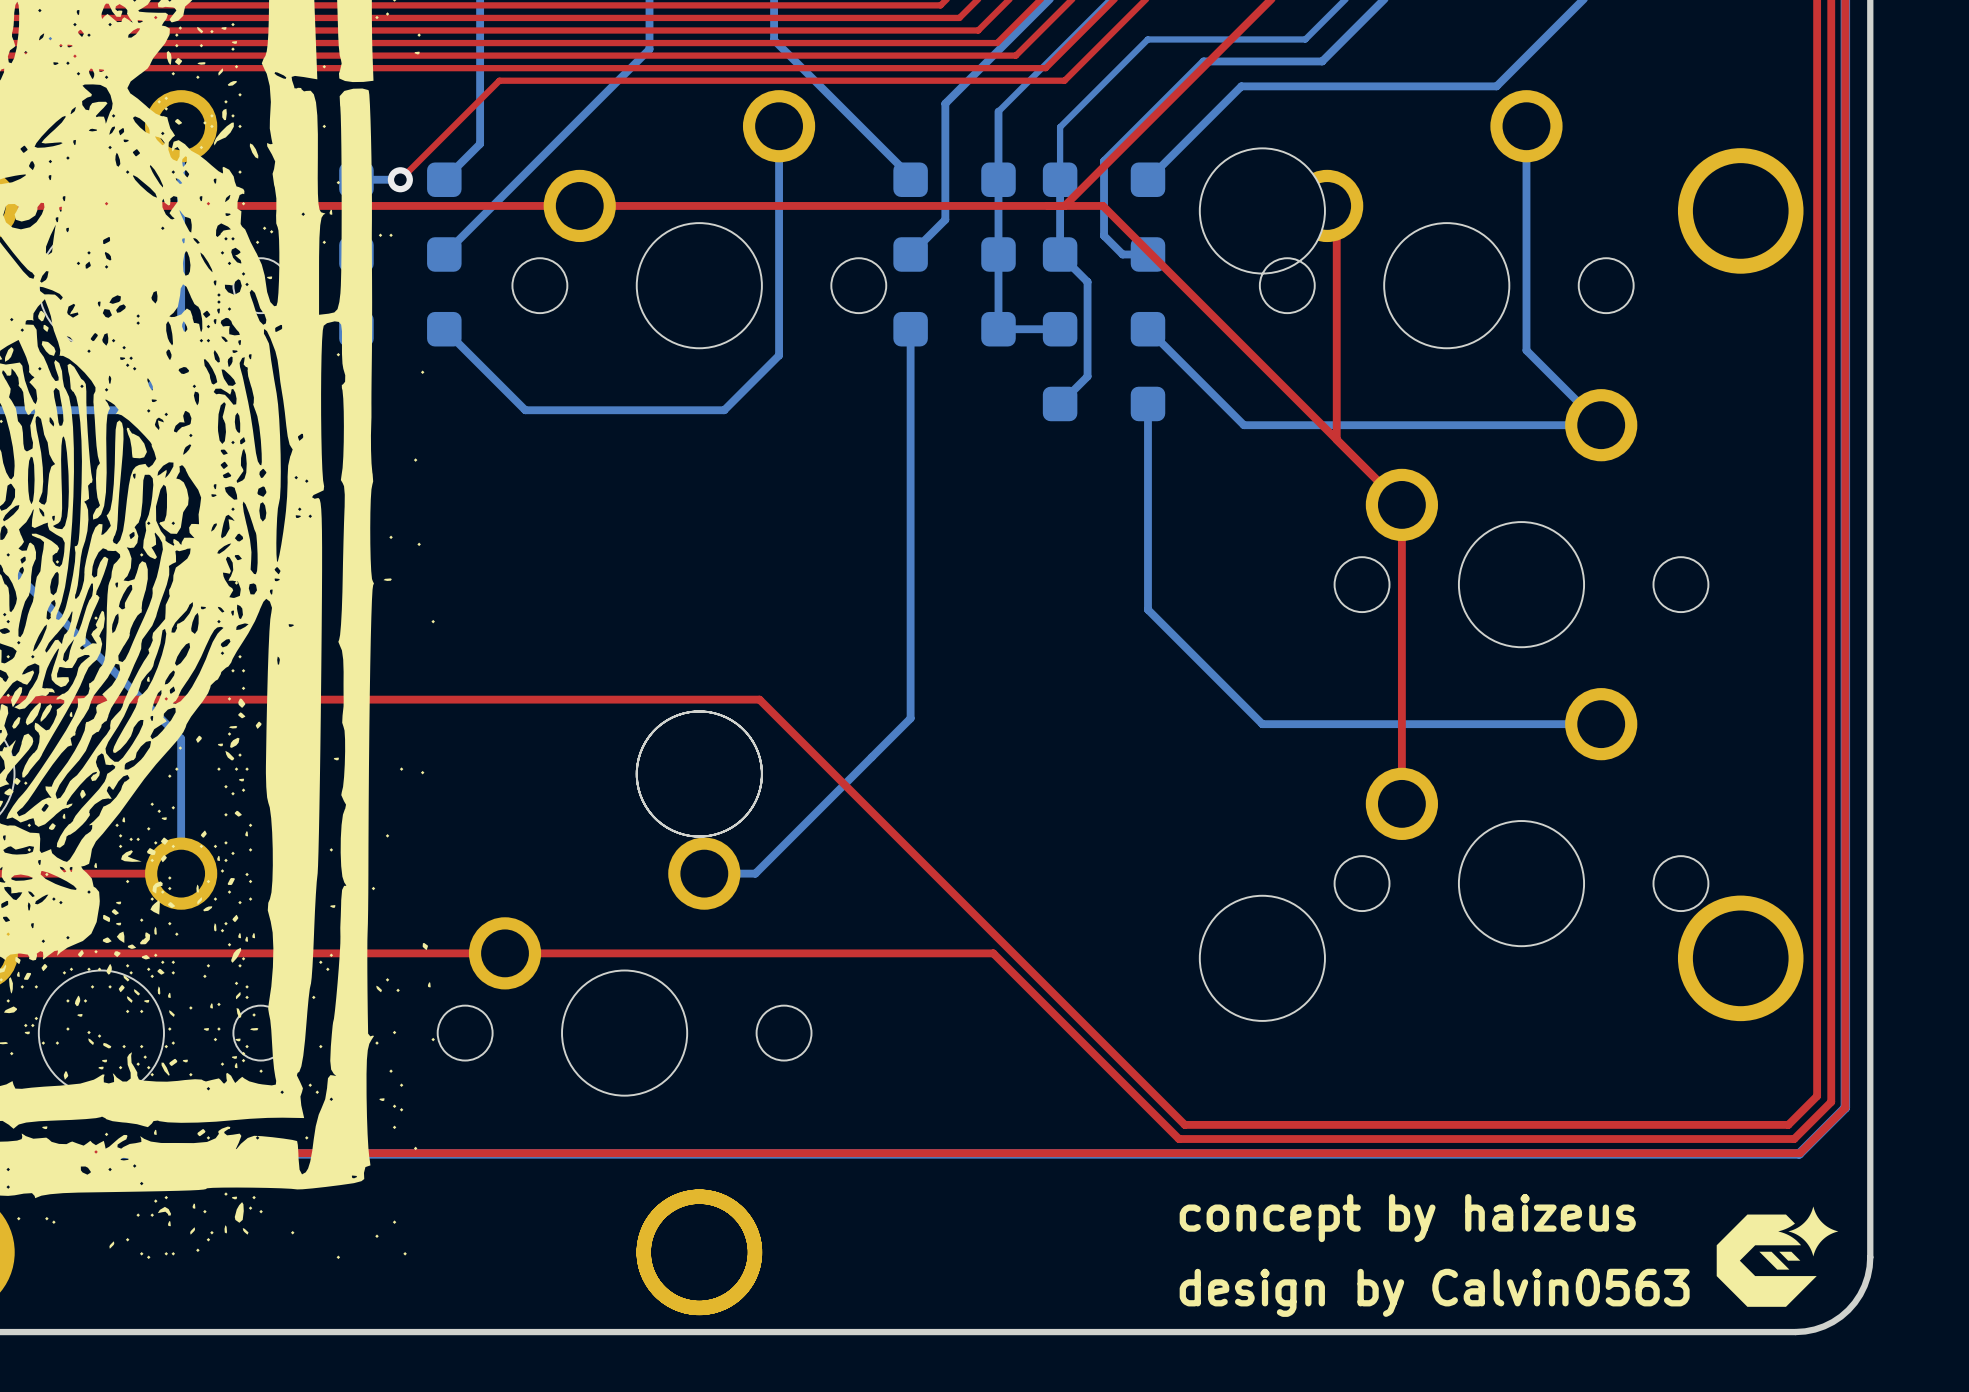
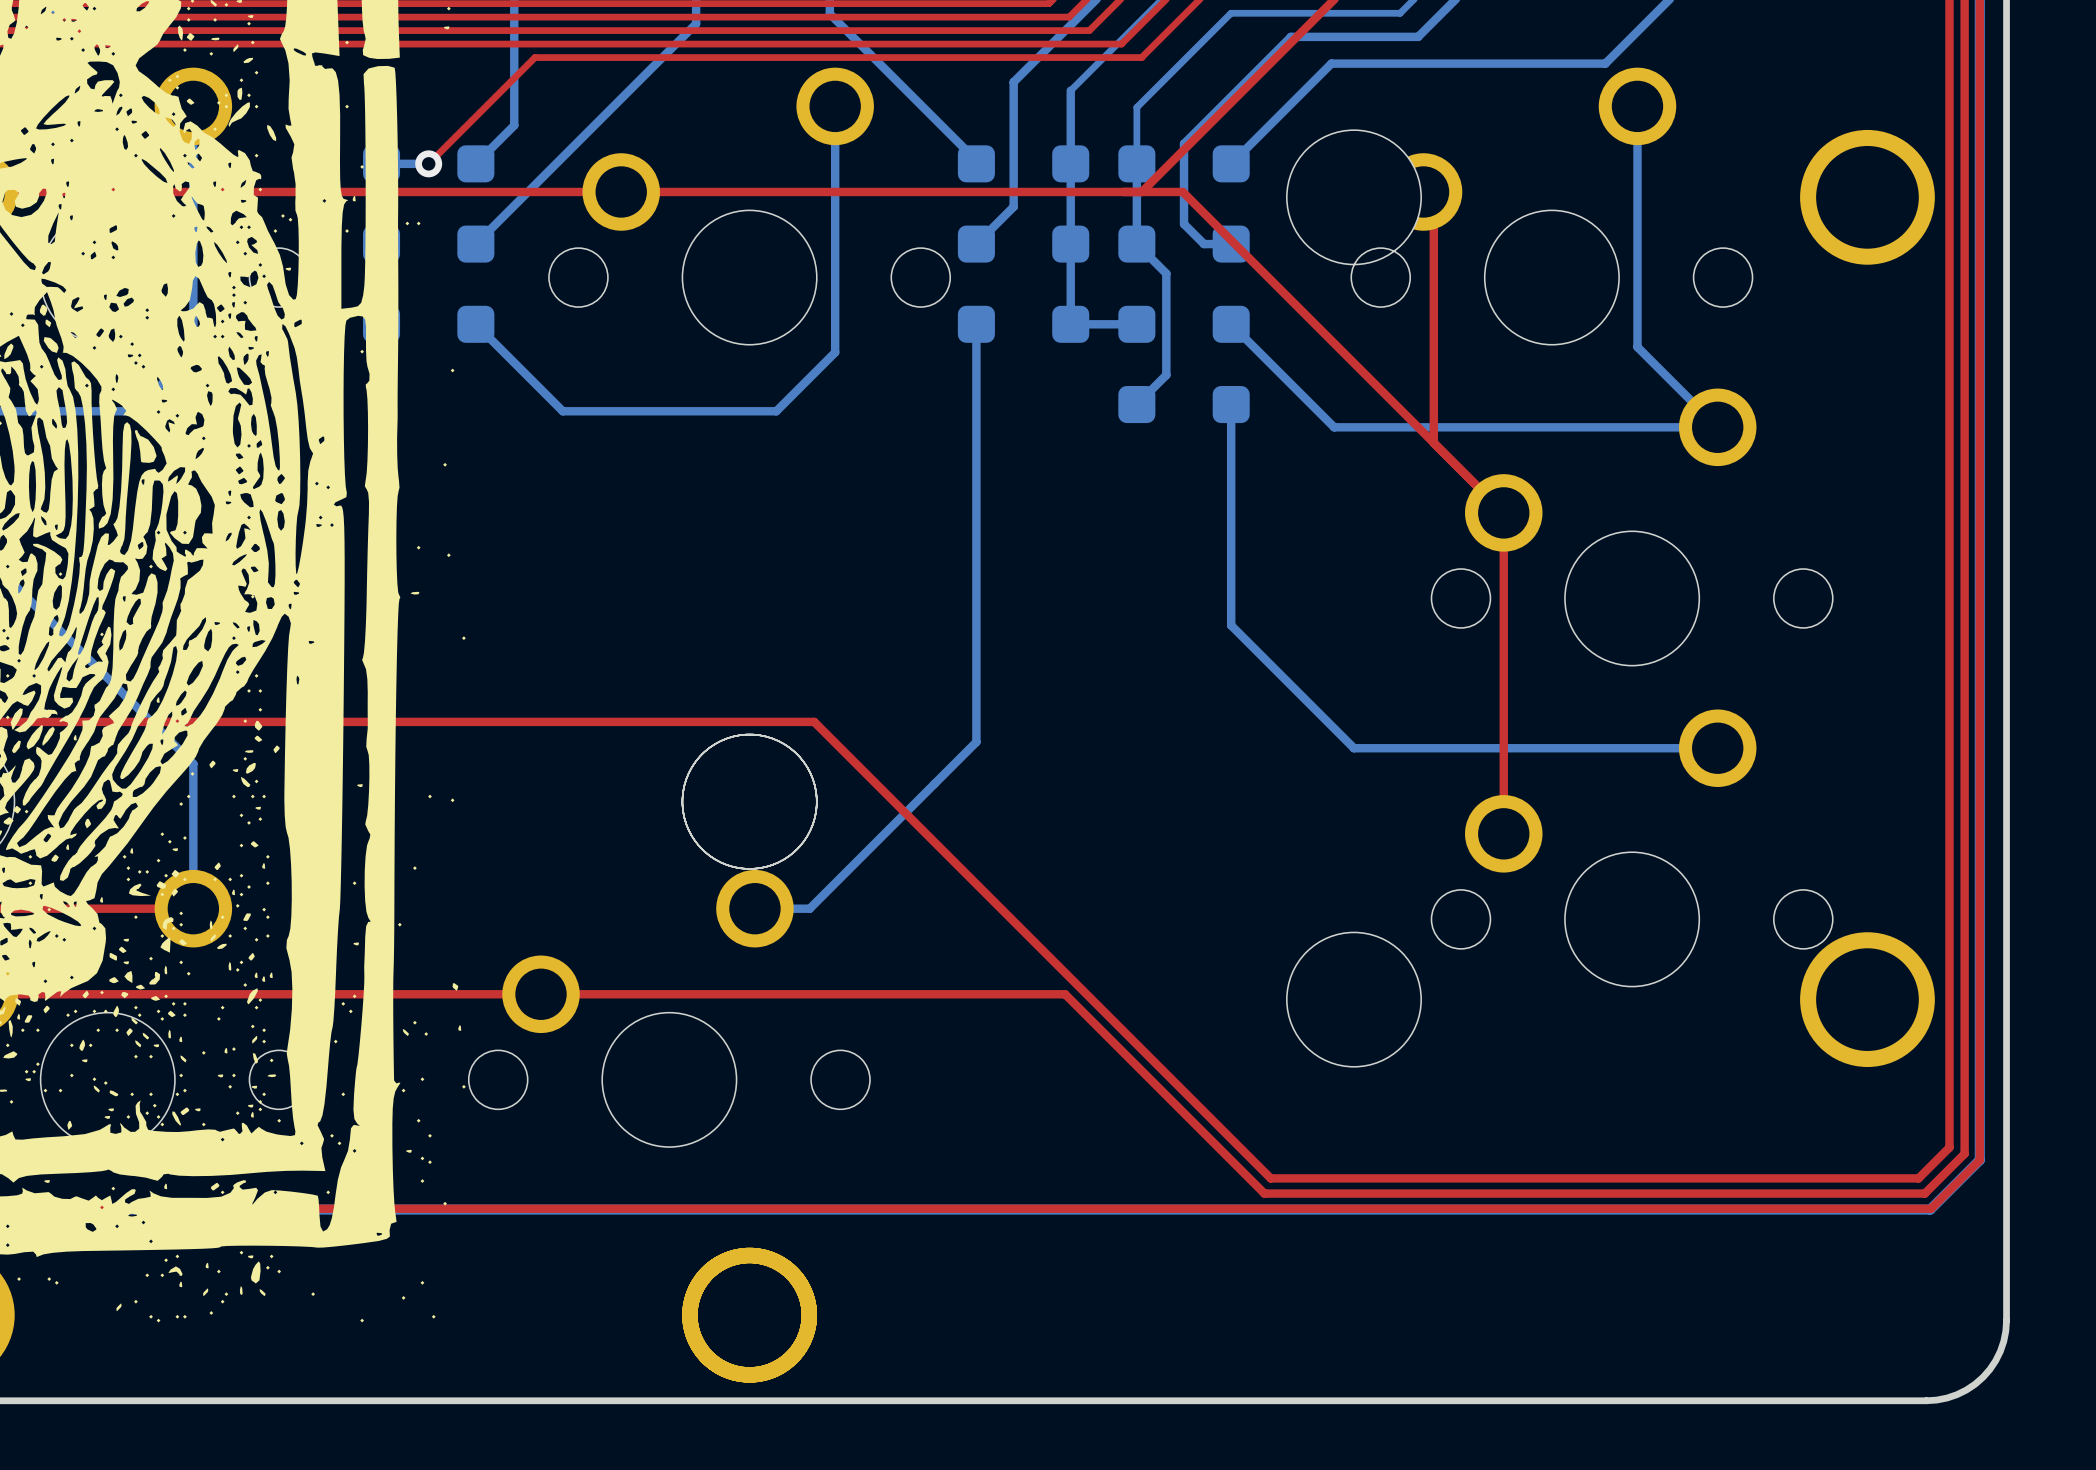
drawing: [1716, 1206, 1839, 1307] -> none
text: concept by haizeus (1407, 1218) -> none
text: design by Calvin0563 (1434, 1292) -> none

